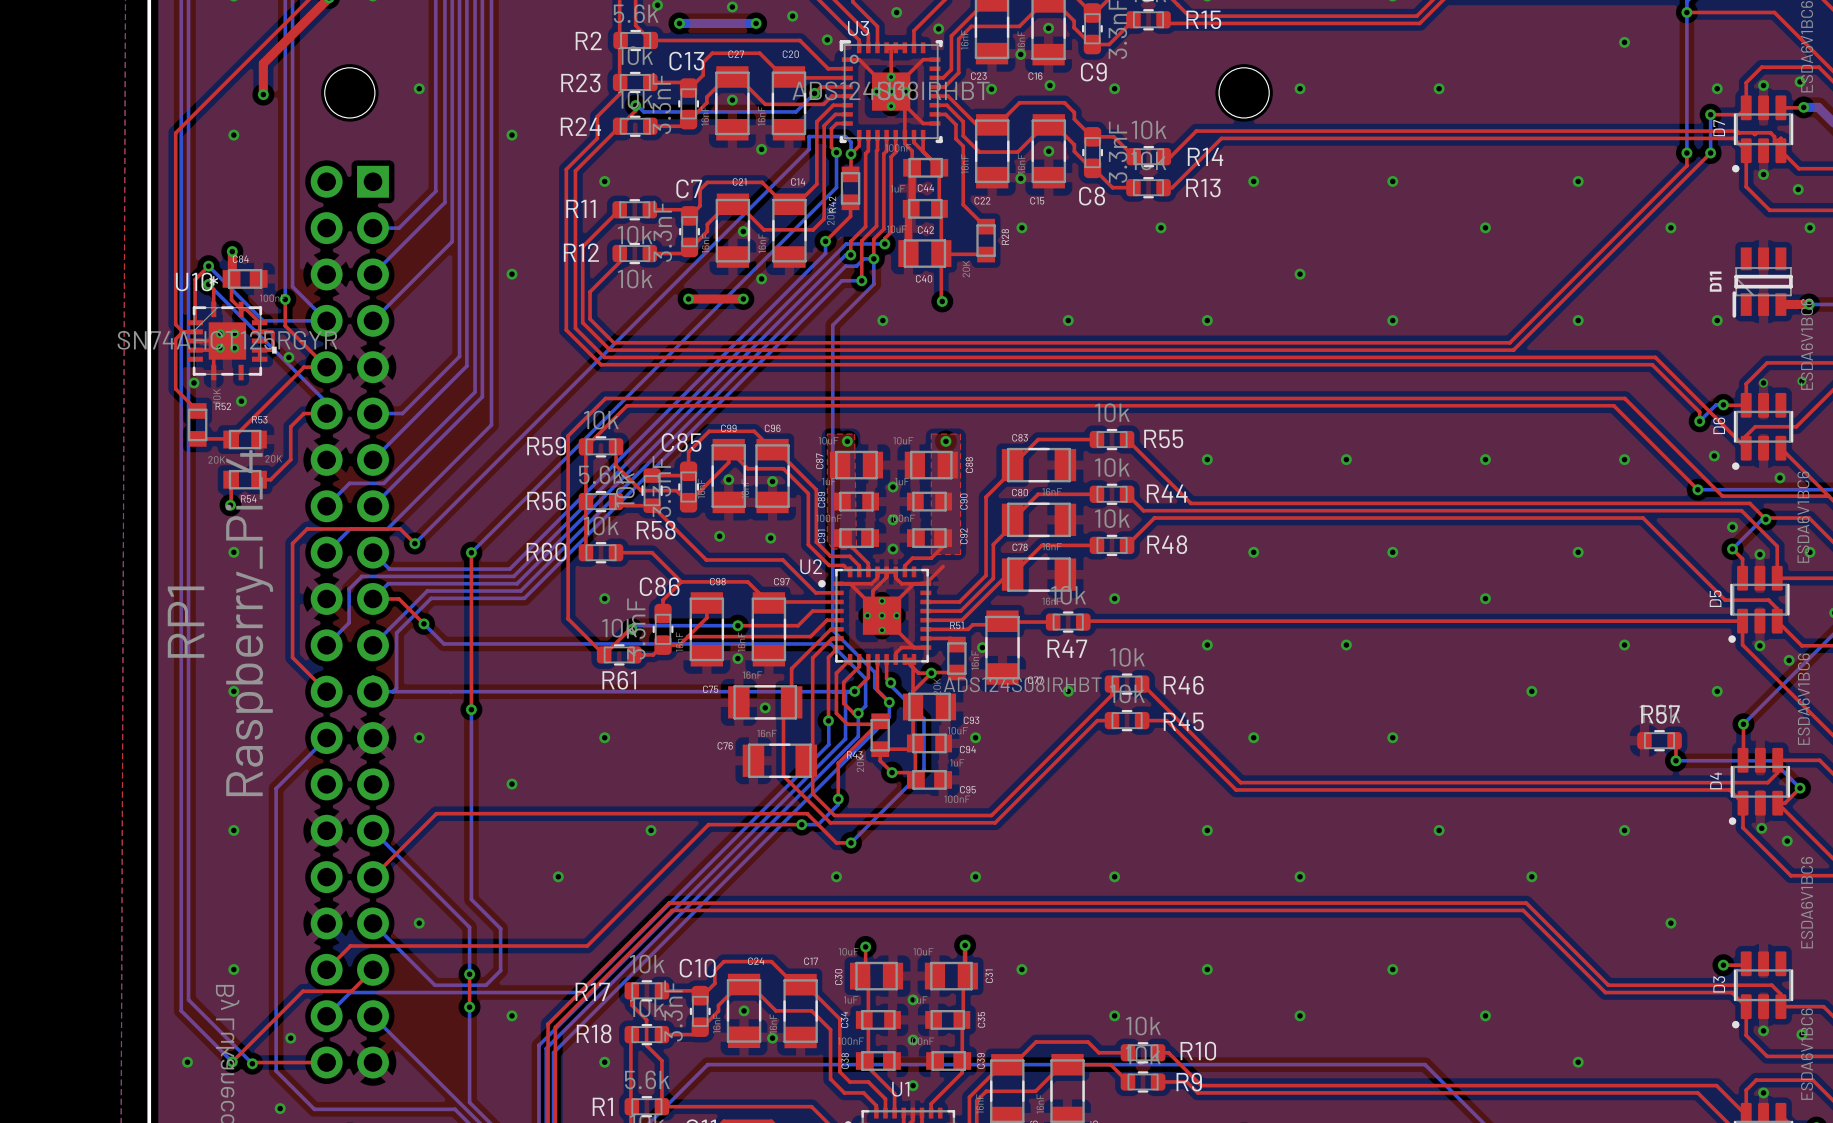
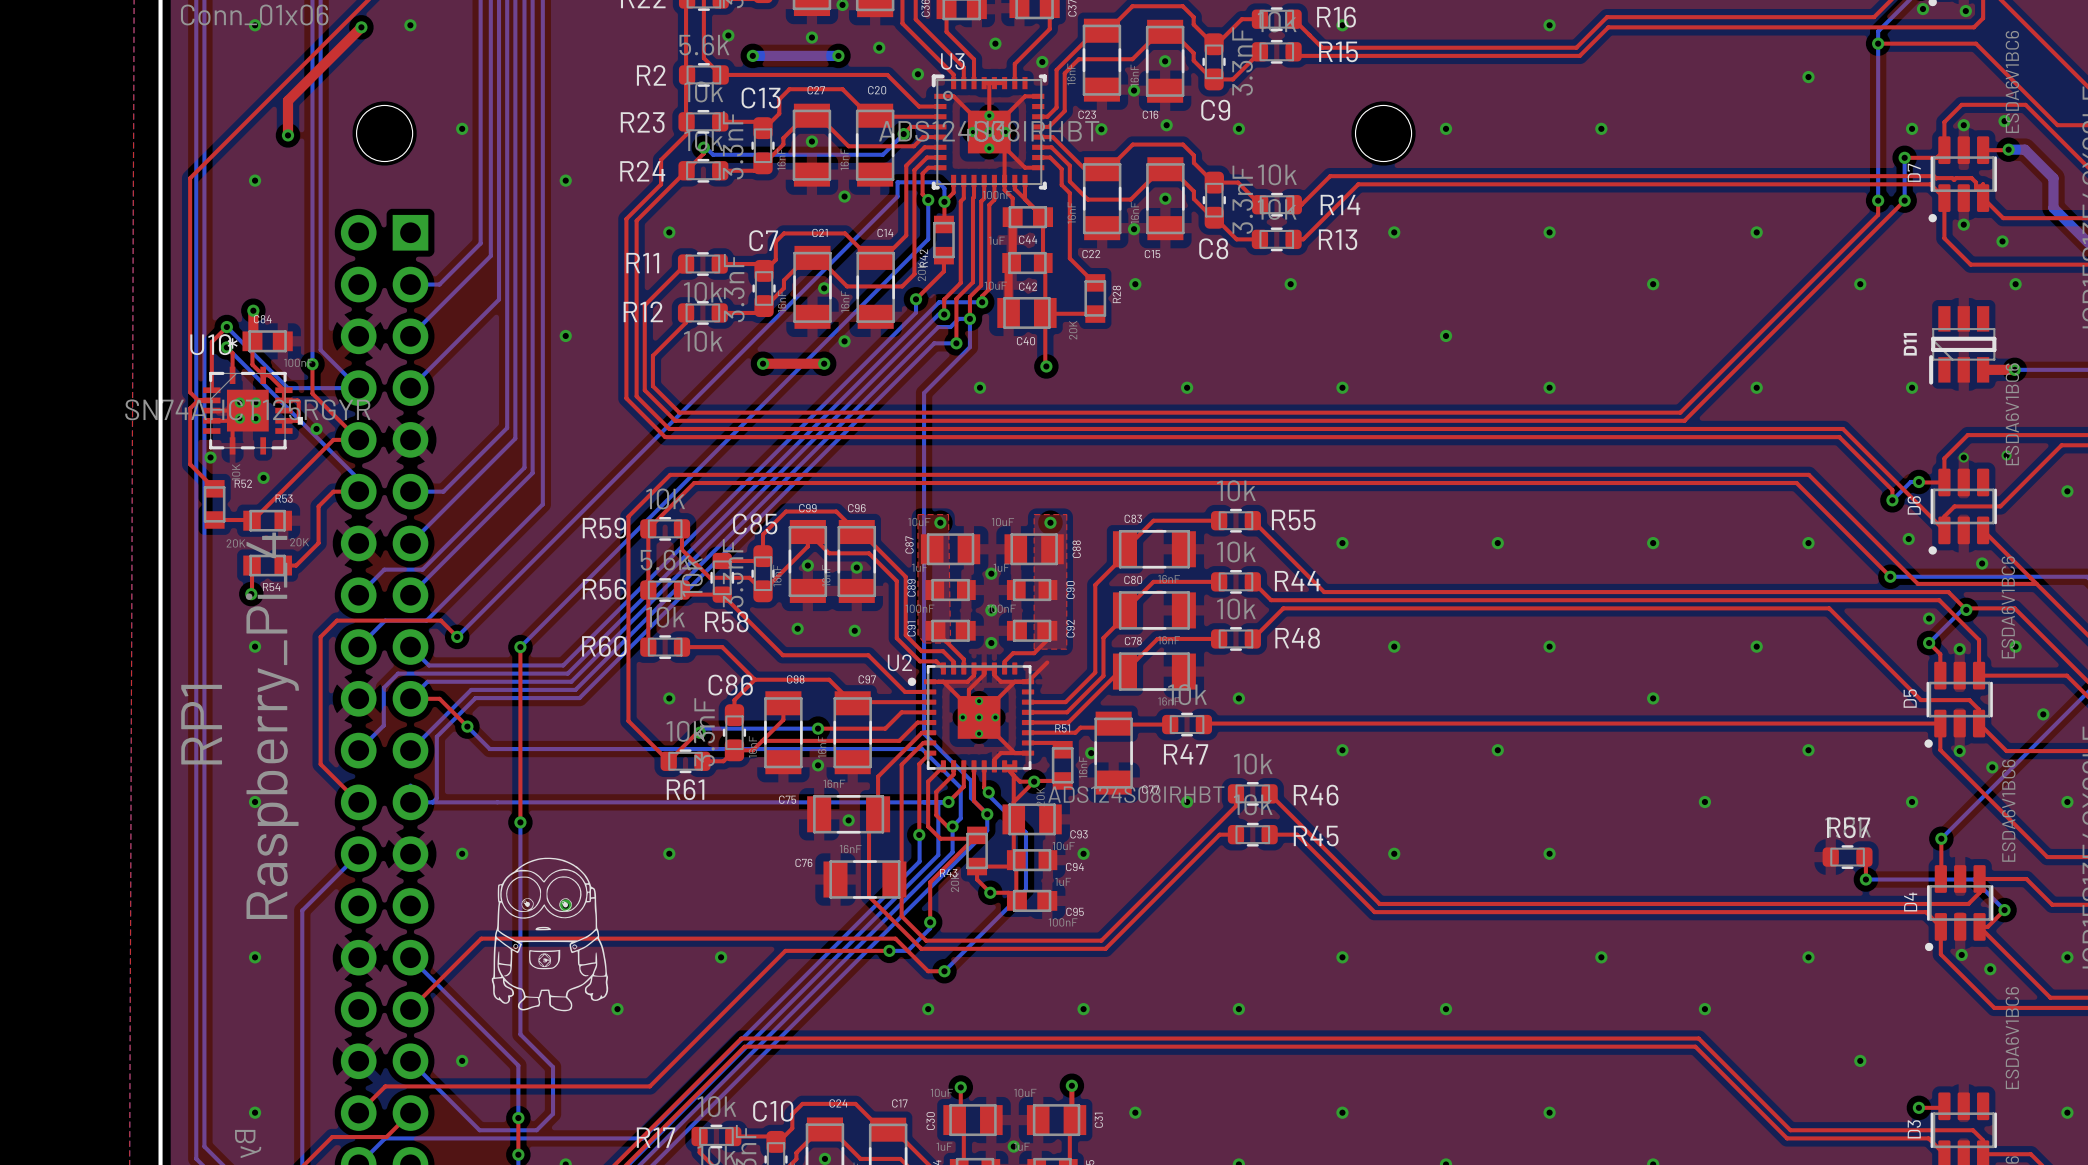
drawing: none -> [491, 857, 609, 1012]

